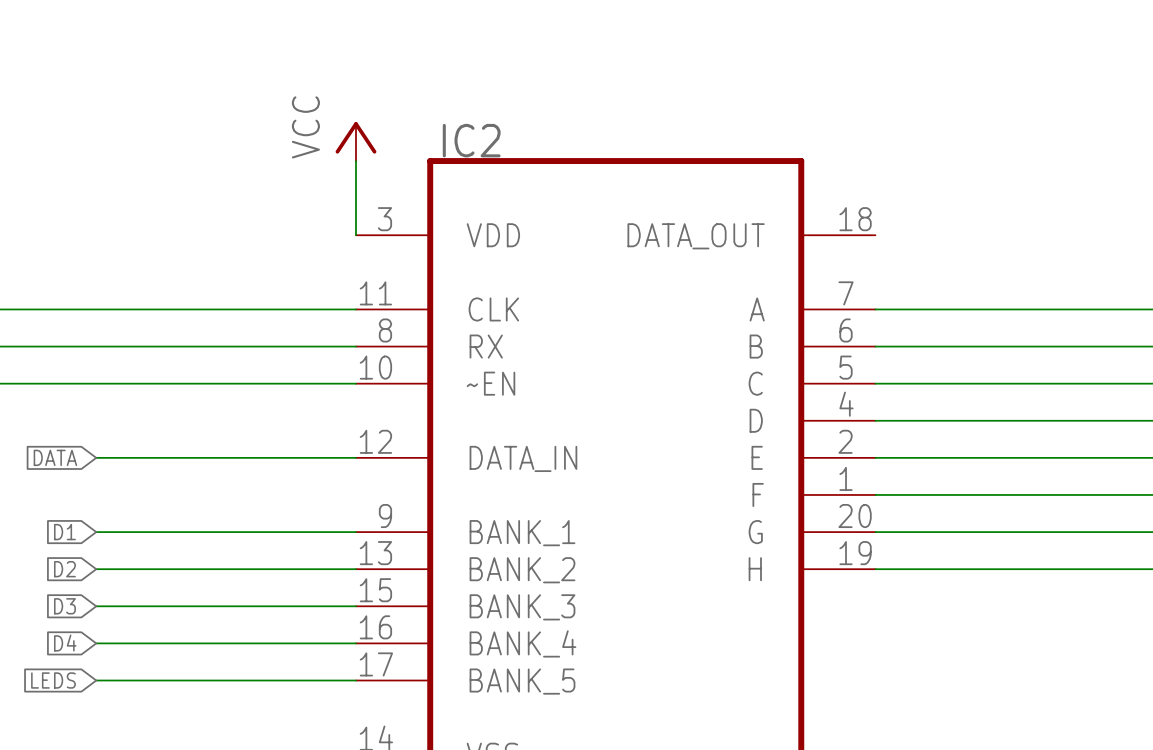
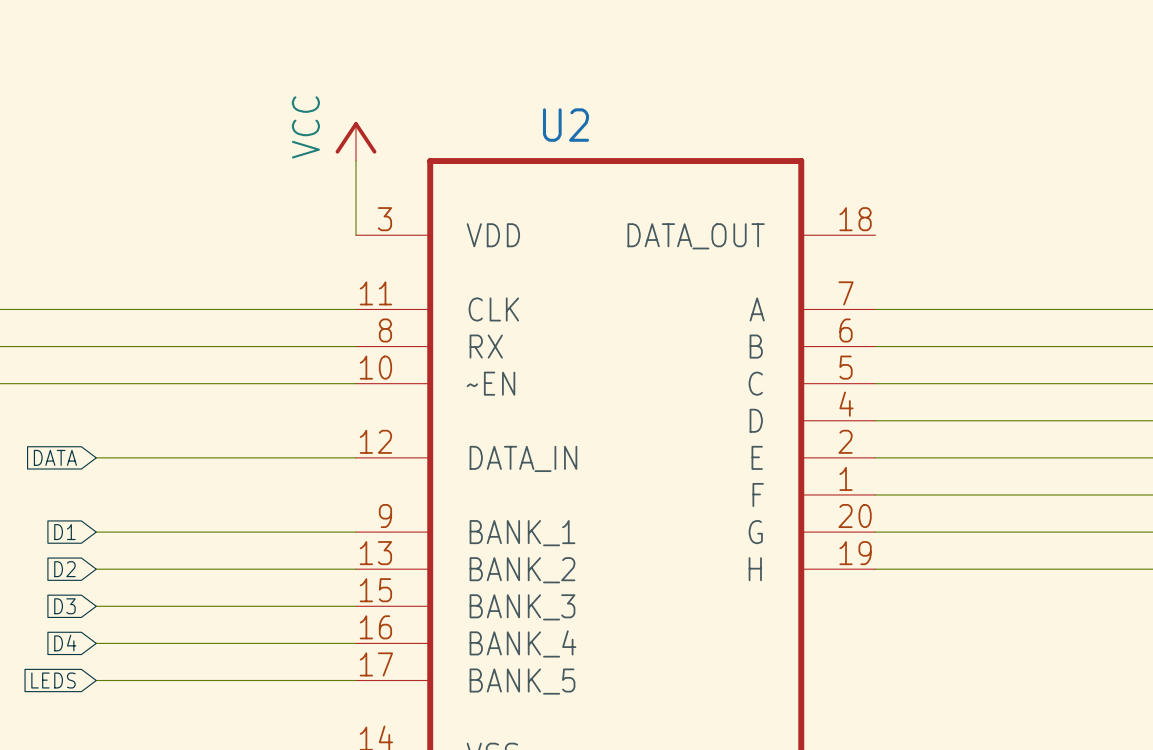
IC2 name: IC2 (471, 140) -> U2 (566, 125)

